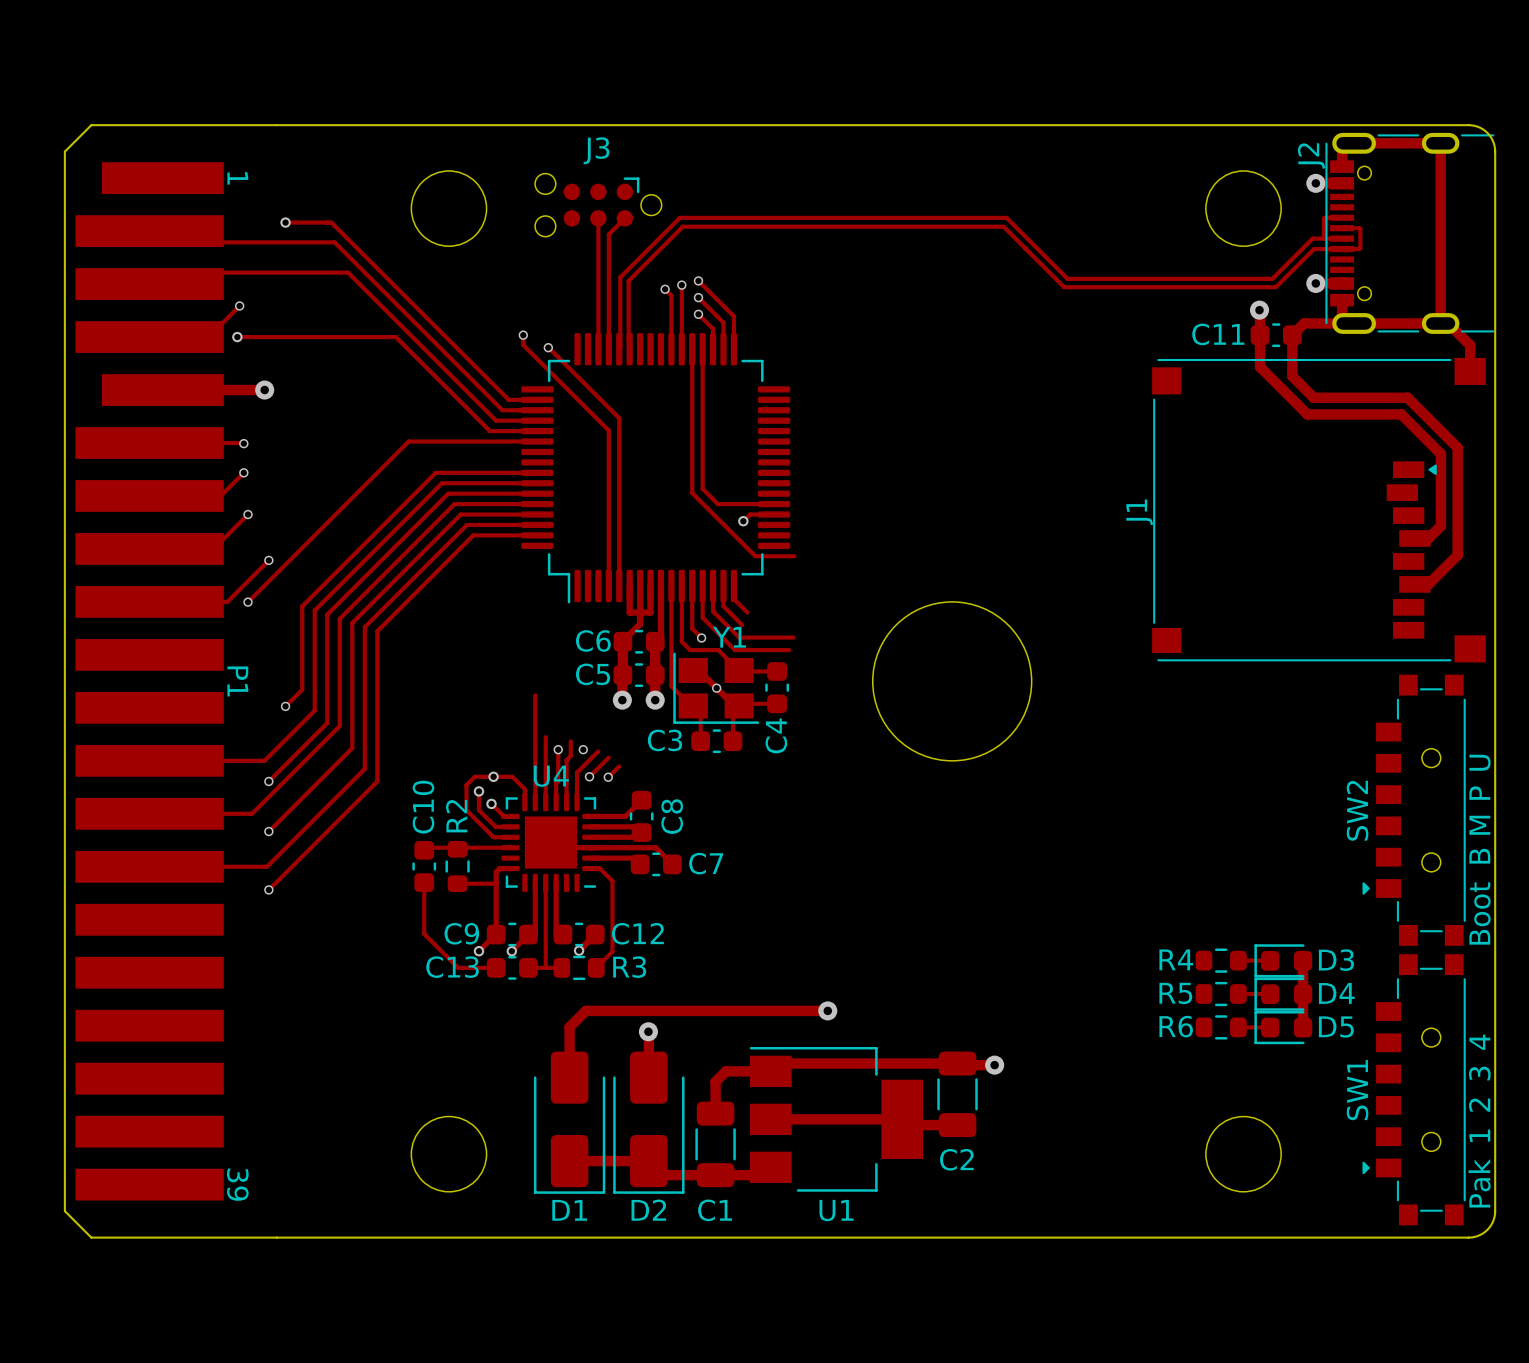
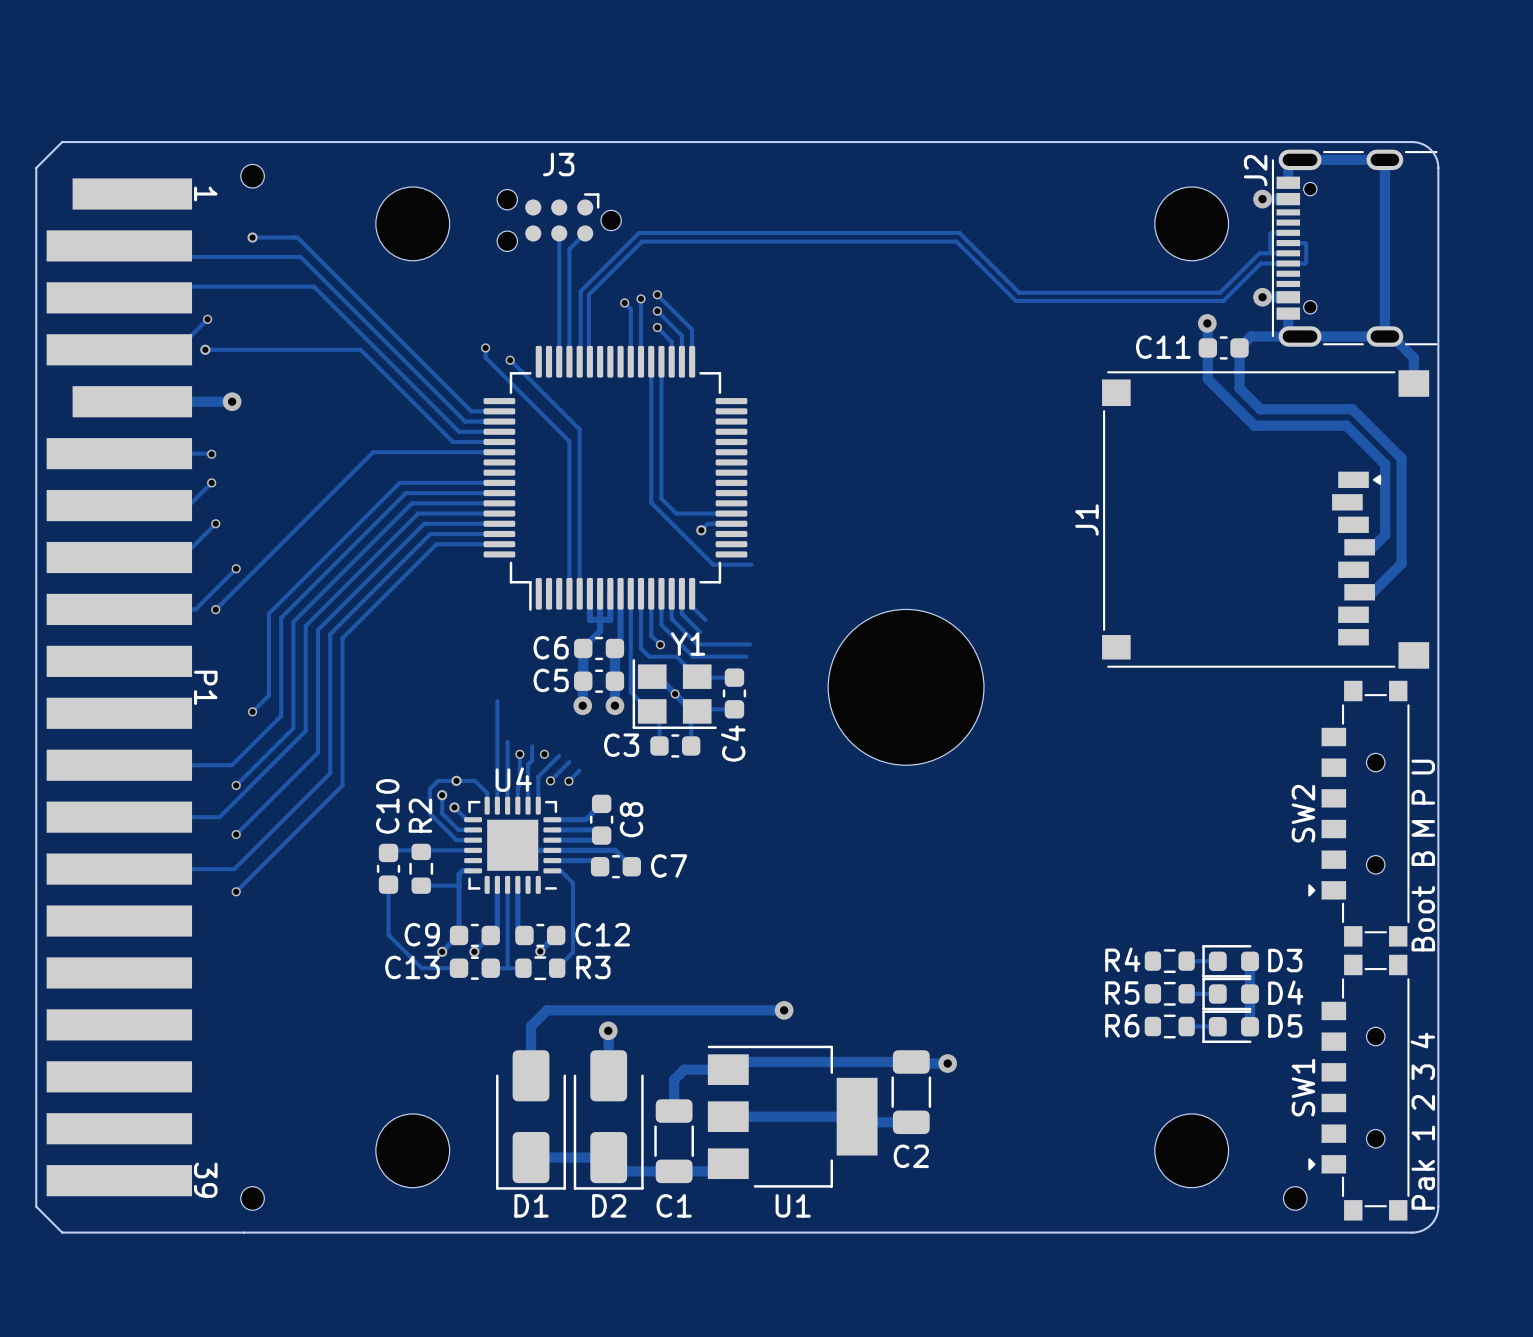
part: none -> (252, 176)
part: none -> (252, 1198)
part: none -> (1295, 1198)

